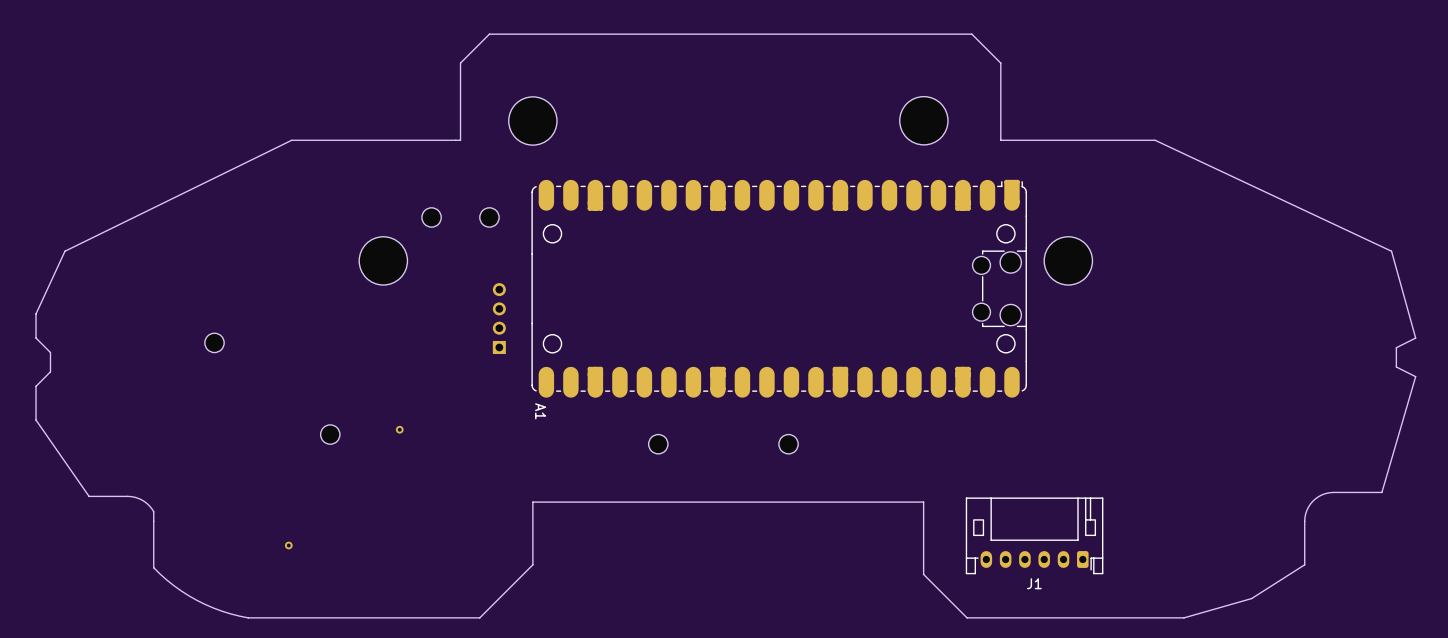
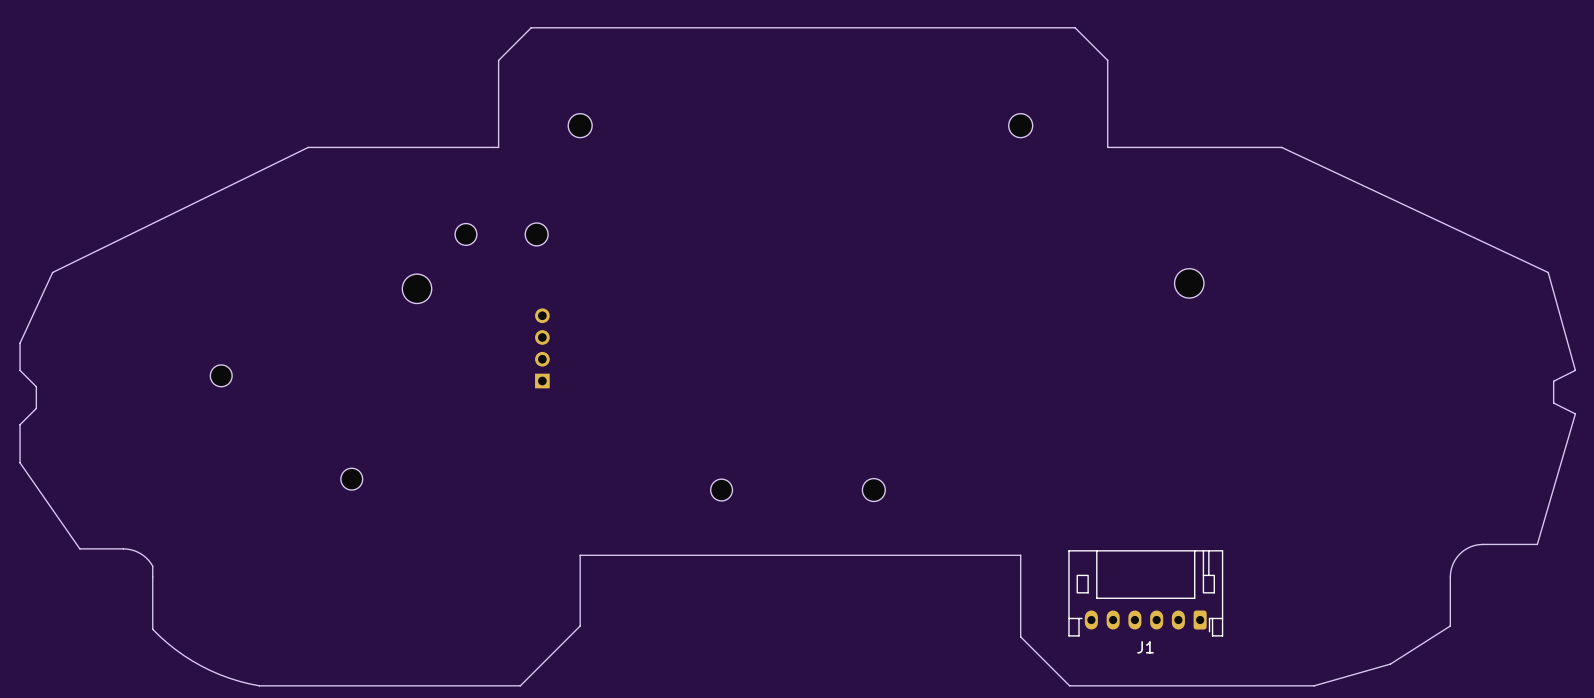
part footprint: [508, 96, 558, 146] -> [568, 113, 593, 138]
part footprint: [899, 96, 948, 145] -> [1008, 113, 1033, 138]
part footprint: [479, 207, 500, 228] -> [525, 223, 549, 246]
part footprint: [359, 236, 408, 286] -> [402, 274, 432, 304]
part footprint: [1044, 236, 1093, 286] -> [1174, 268, 1204, 299]
A1: (779, 288) -> none
part: (399, 429) -> none
part footprint: [778, 434, 799, 454] -> [862, 478, 886, 502]
part: (288, 545) -> none

